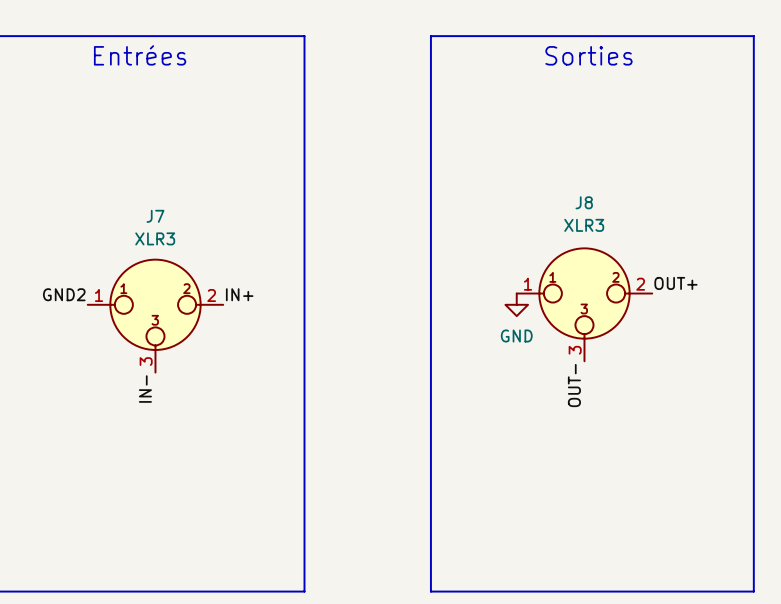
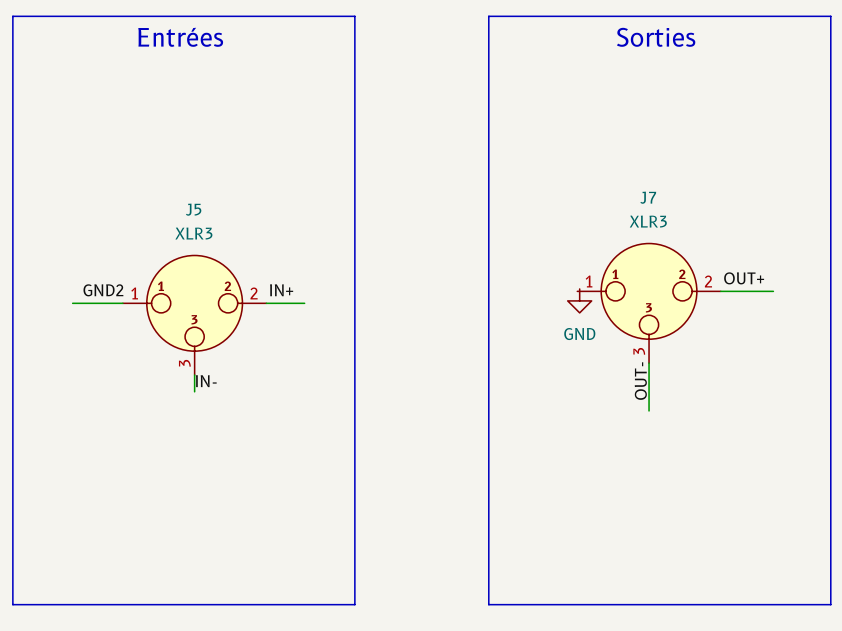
wire: none -> (720, 291) (773, 291)
J8: XLR3 (584, 304) -> none
wire: none -> (72, 303) (122, 303)
wire: none -> (266, 303) (304, 303)
J7 position: (155, 316) -> (649, 303)
J5: none -> XLR3 (194, 315)
wire: none -> (649, 363) (649, 410)
wire: none -> (194, 375) (194, 391)
label rotation: 0° (145, 389) -> 90° clockwise (206, 381)

